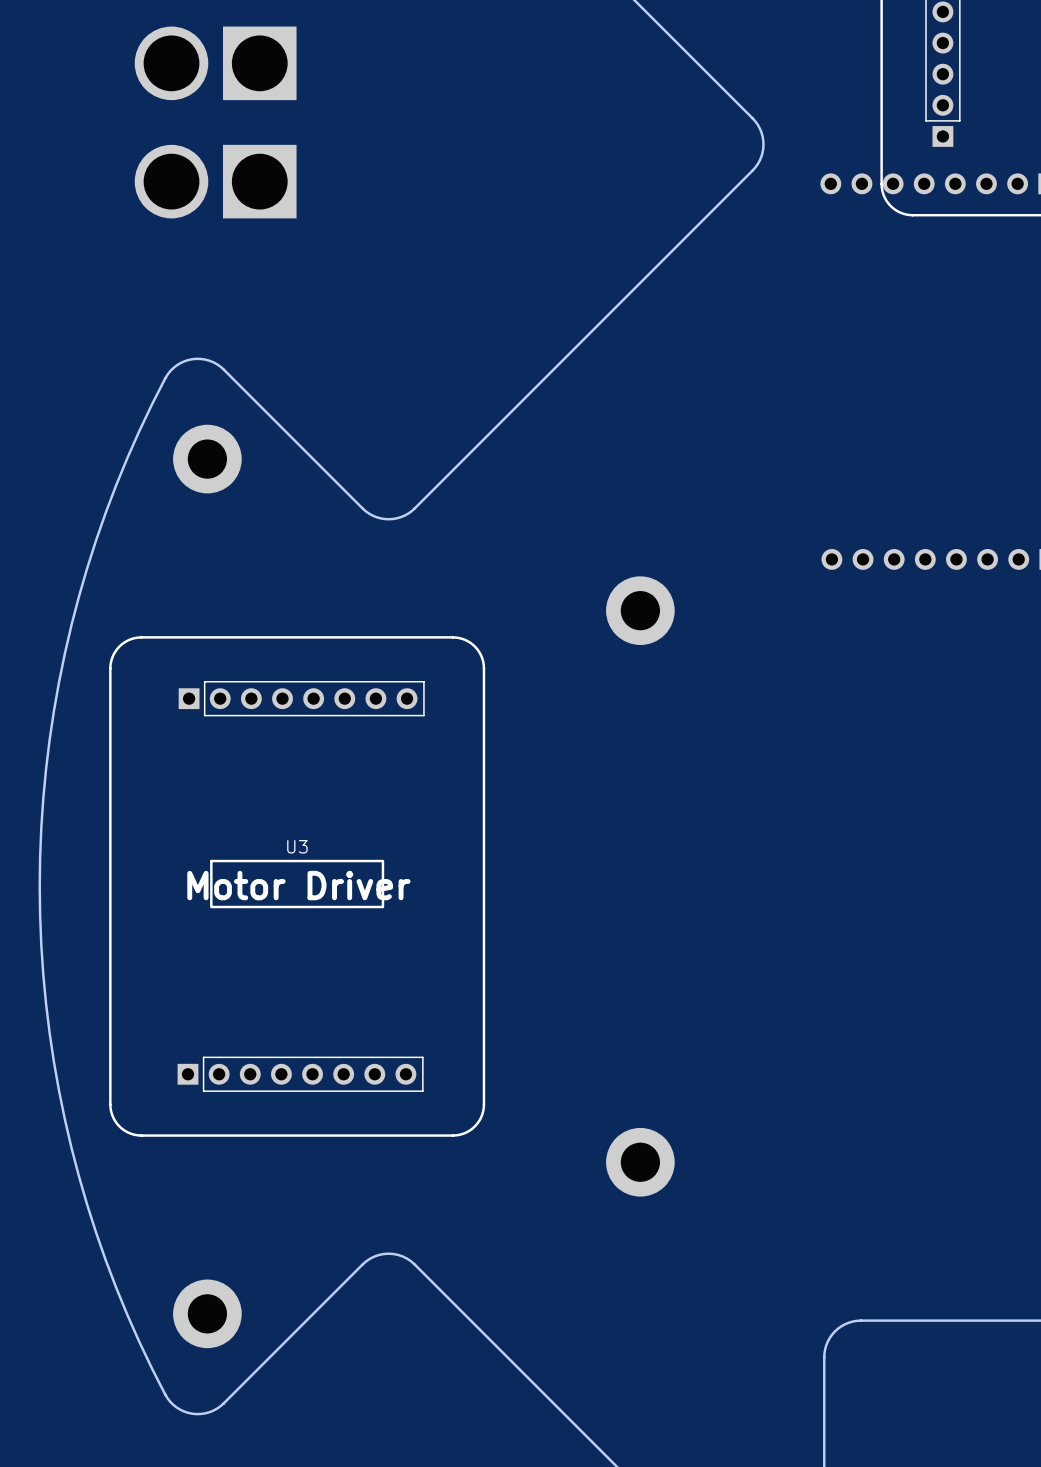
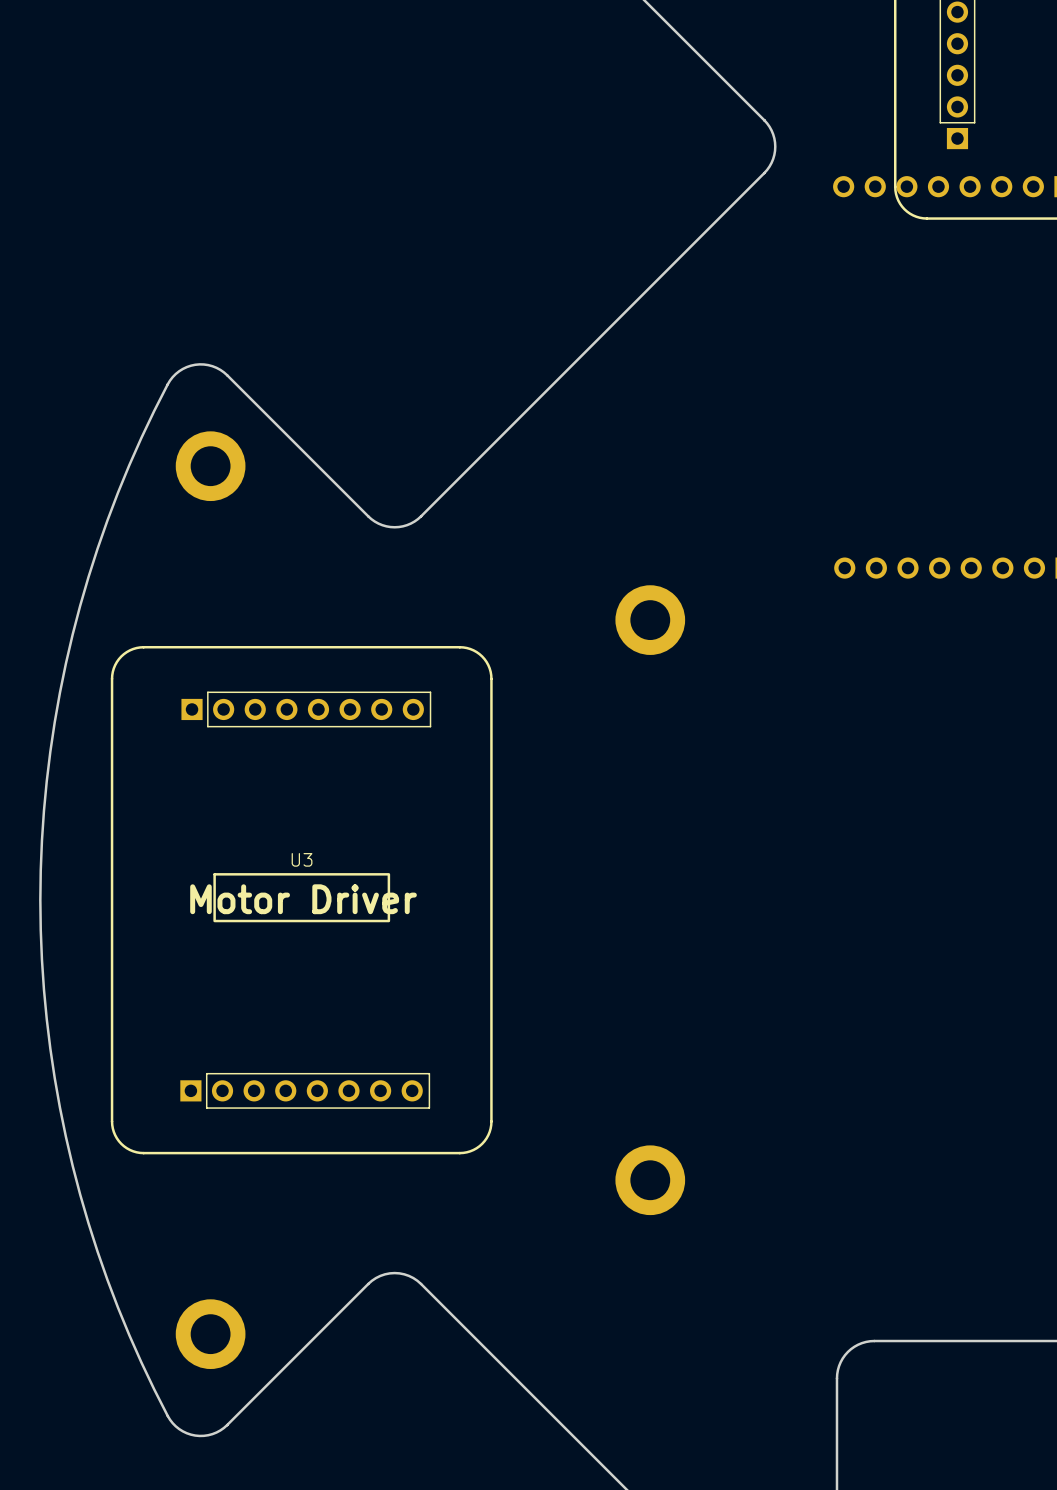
part: (215, 63) -> none
part: (215, 181) -> none

